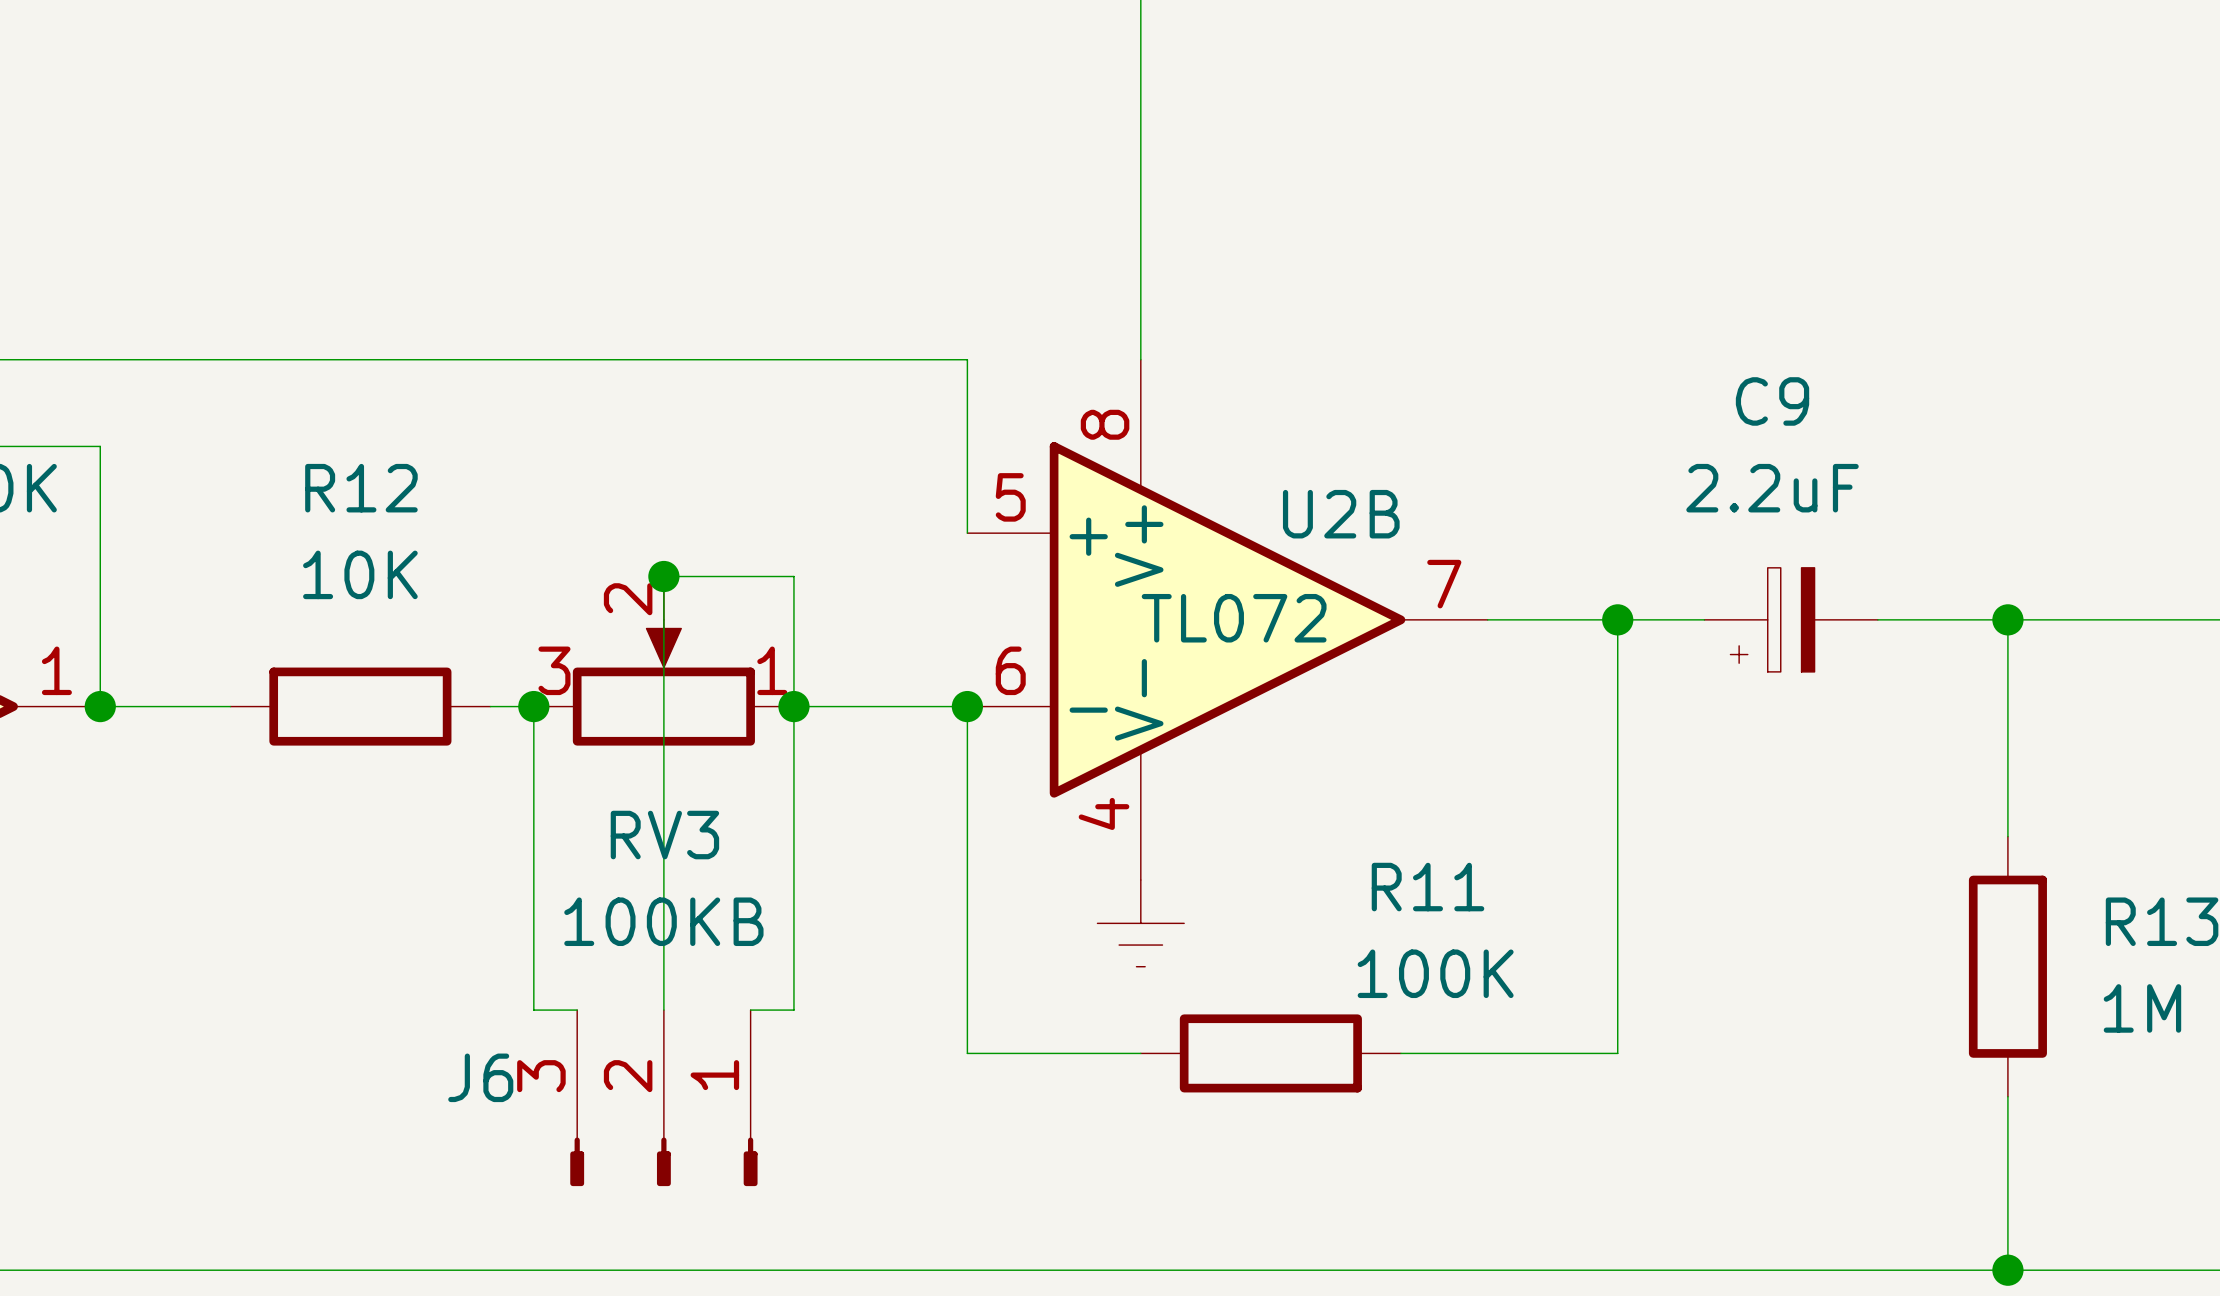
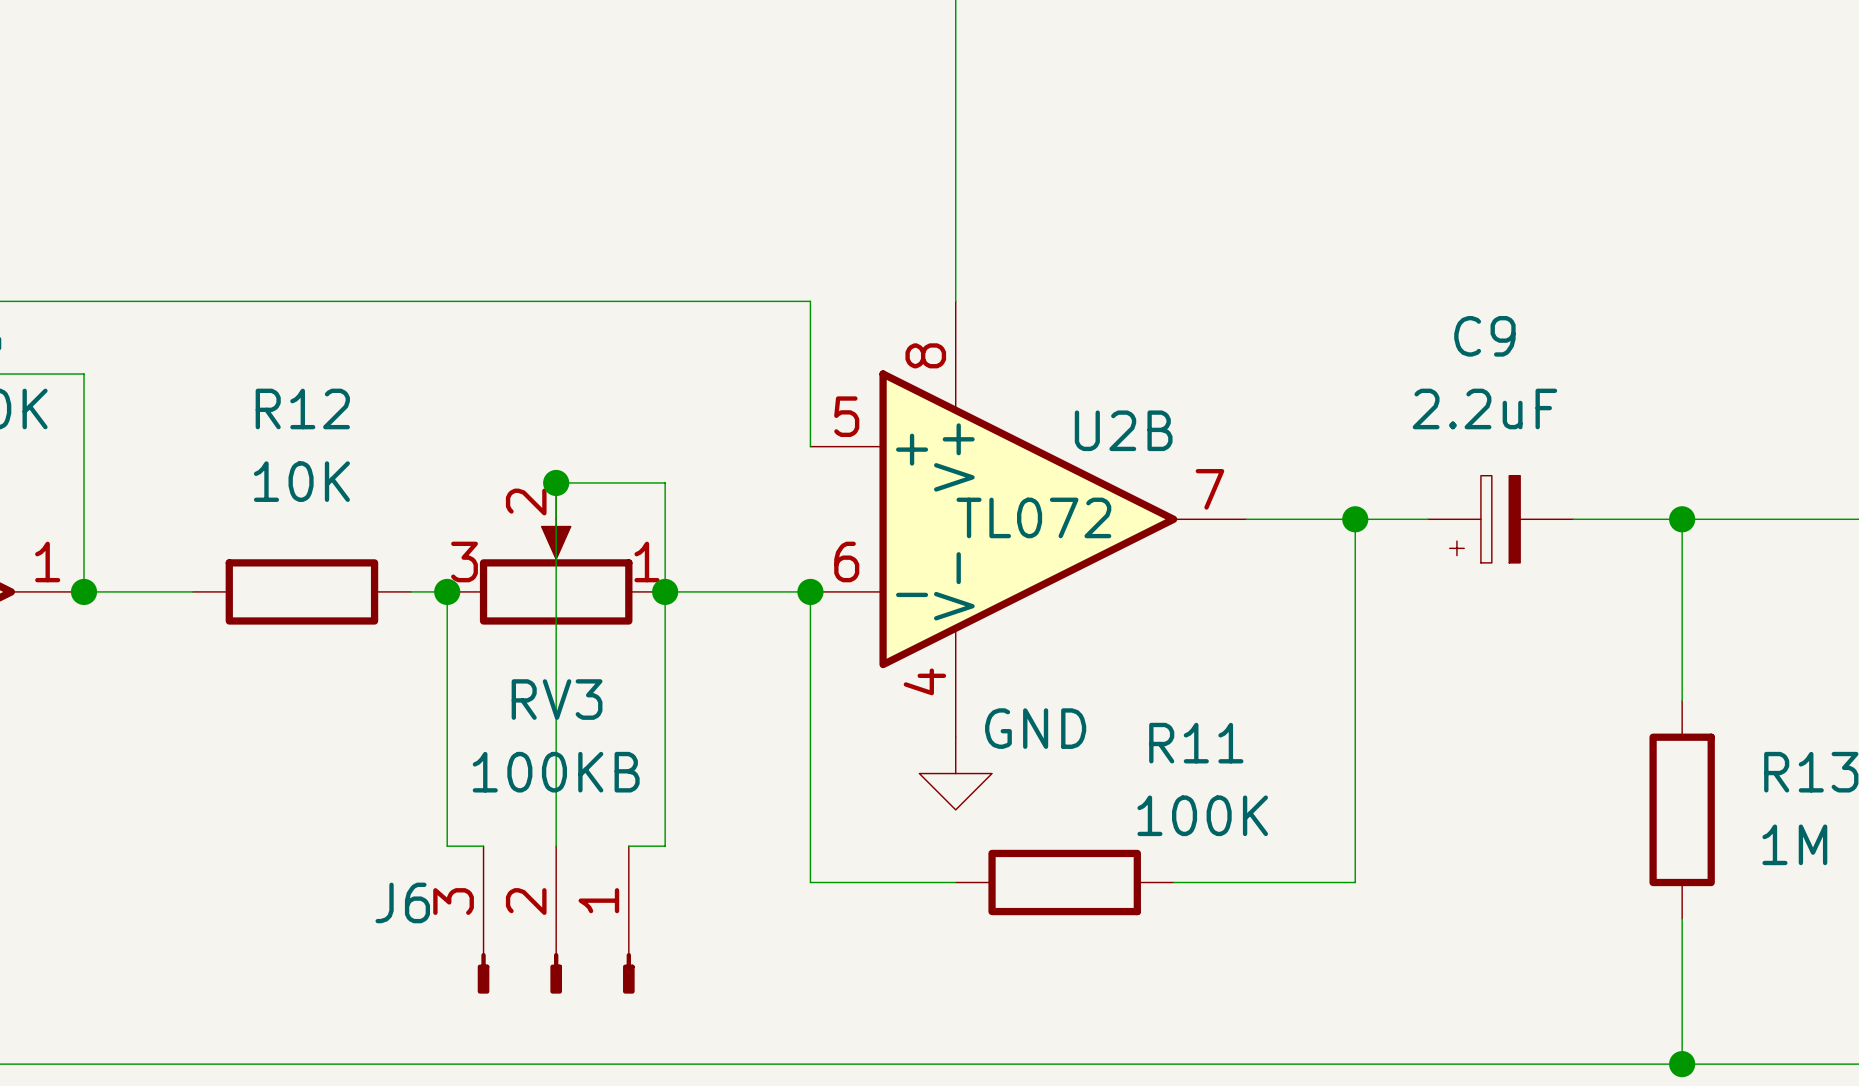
power symbol text: none -> GND (1035, 728)
power symbol shape: [1097, 880, 1185, 967] -> [919, 737, 993, 810]

